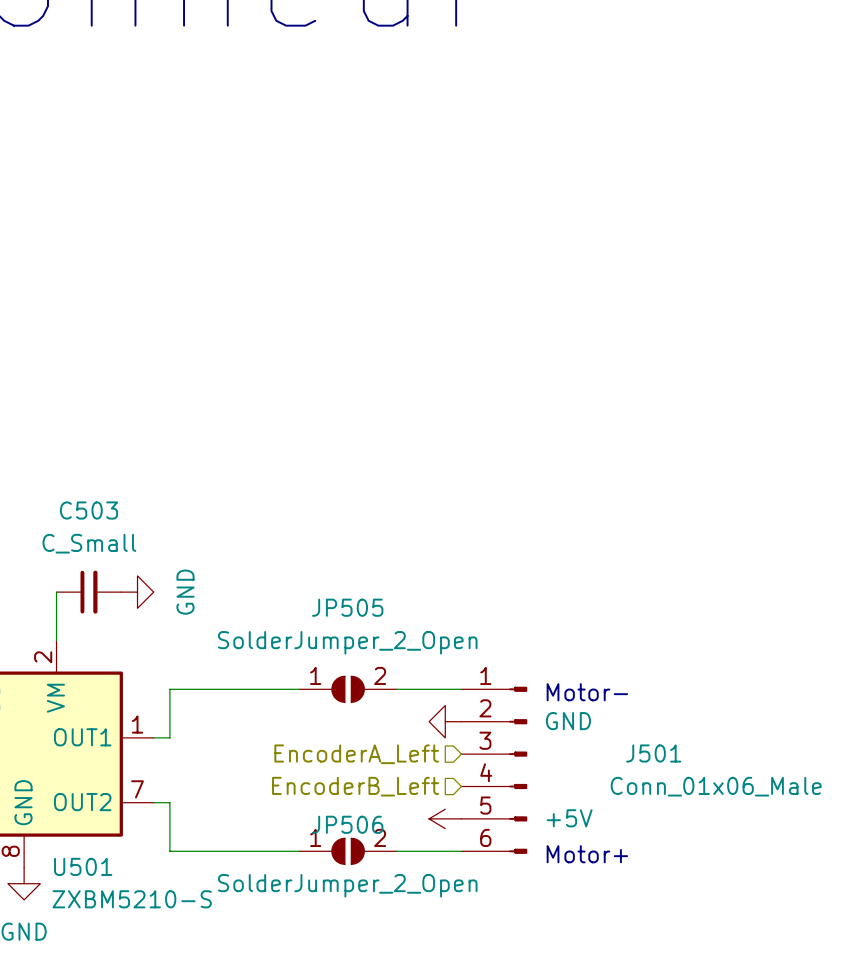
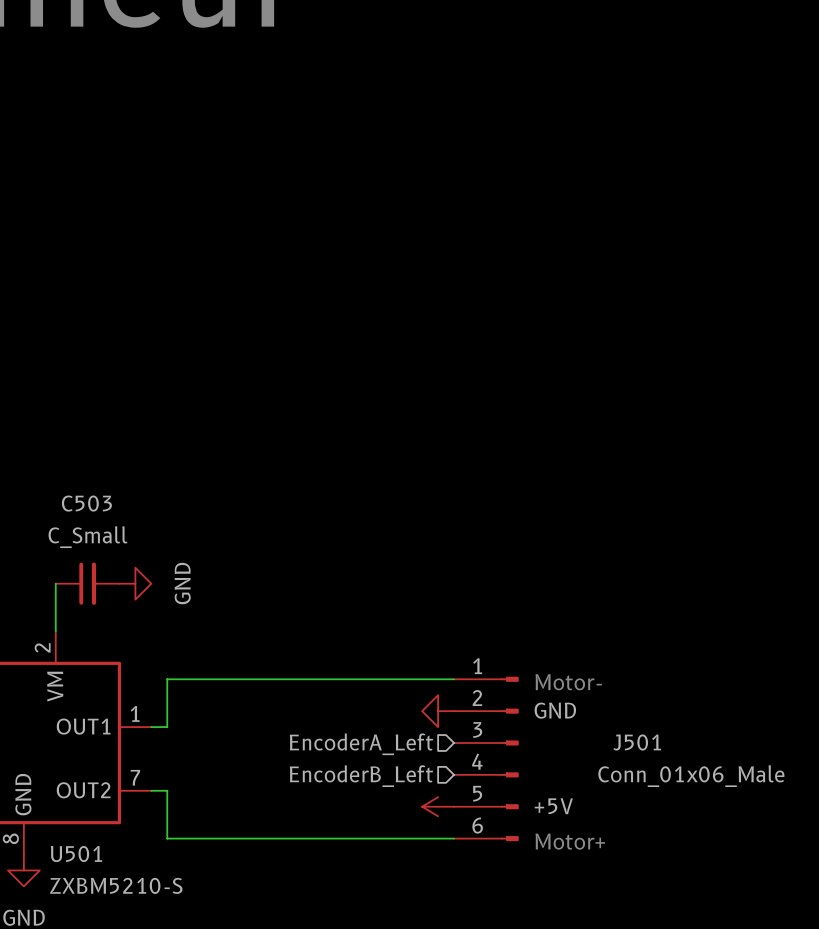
JP505: SolderJumper_2_Open (348, 689) -> none
JP506: SolderJumper_2_Open (348, 851) -> none

